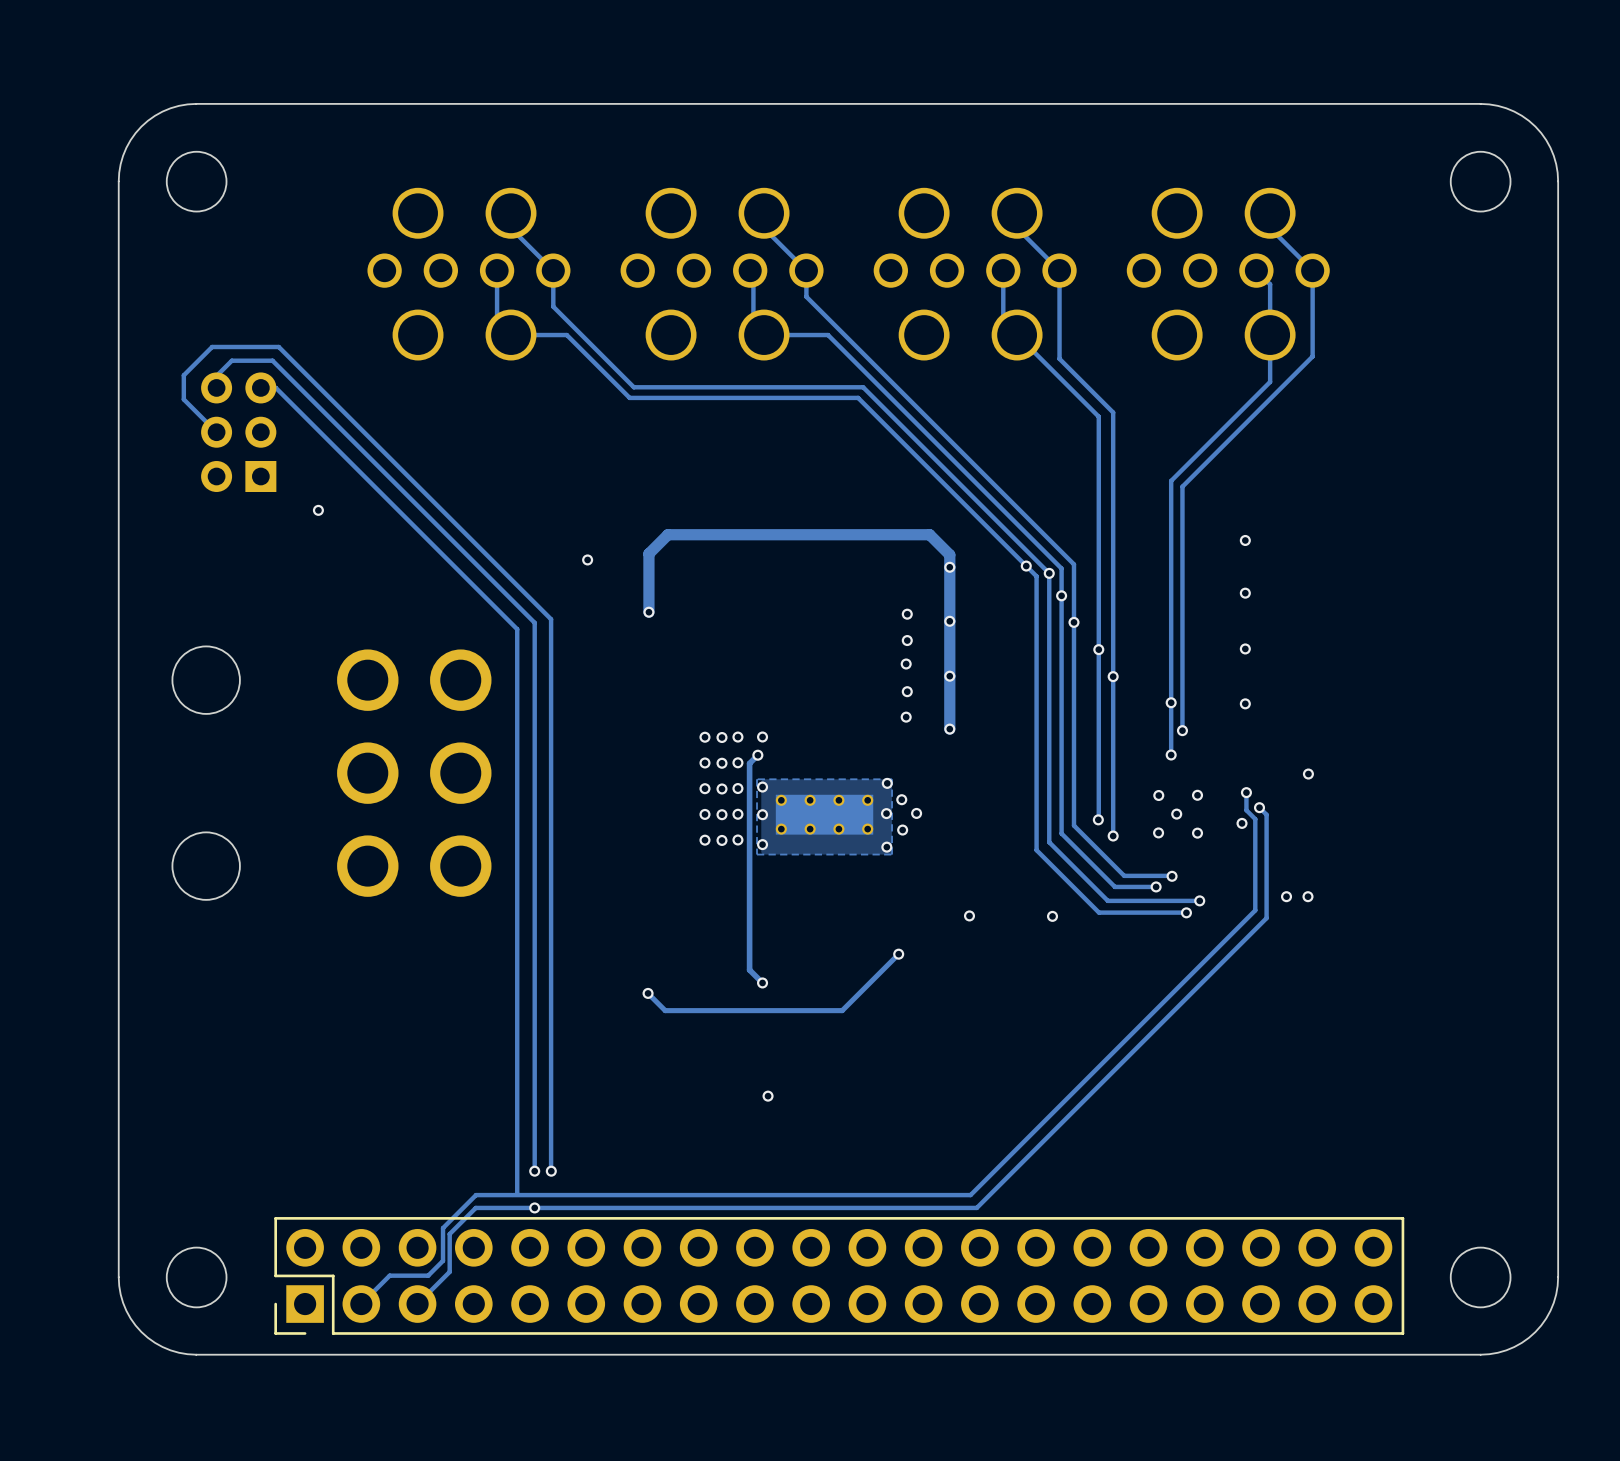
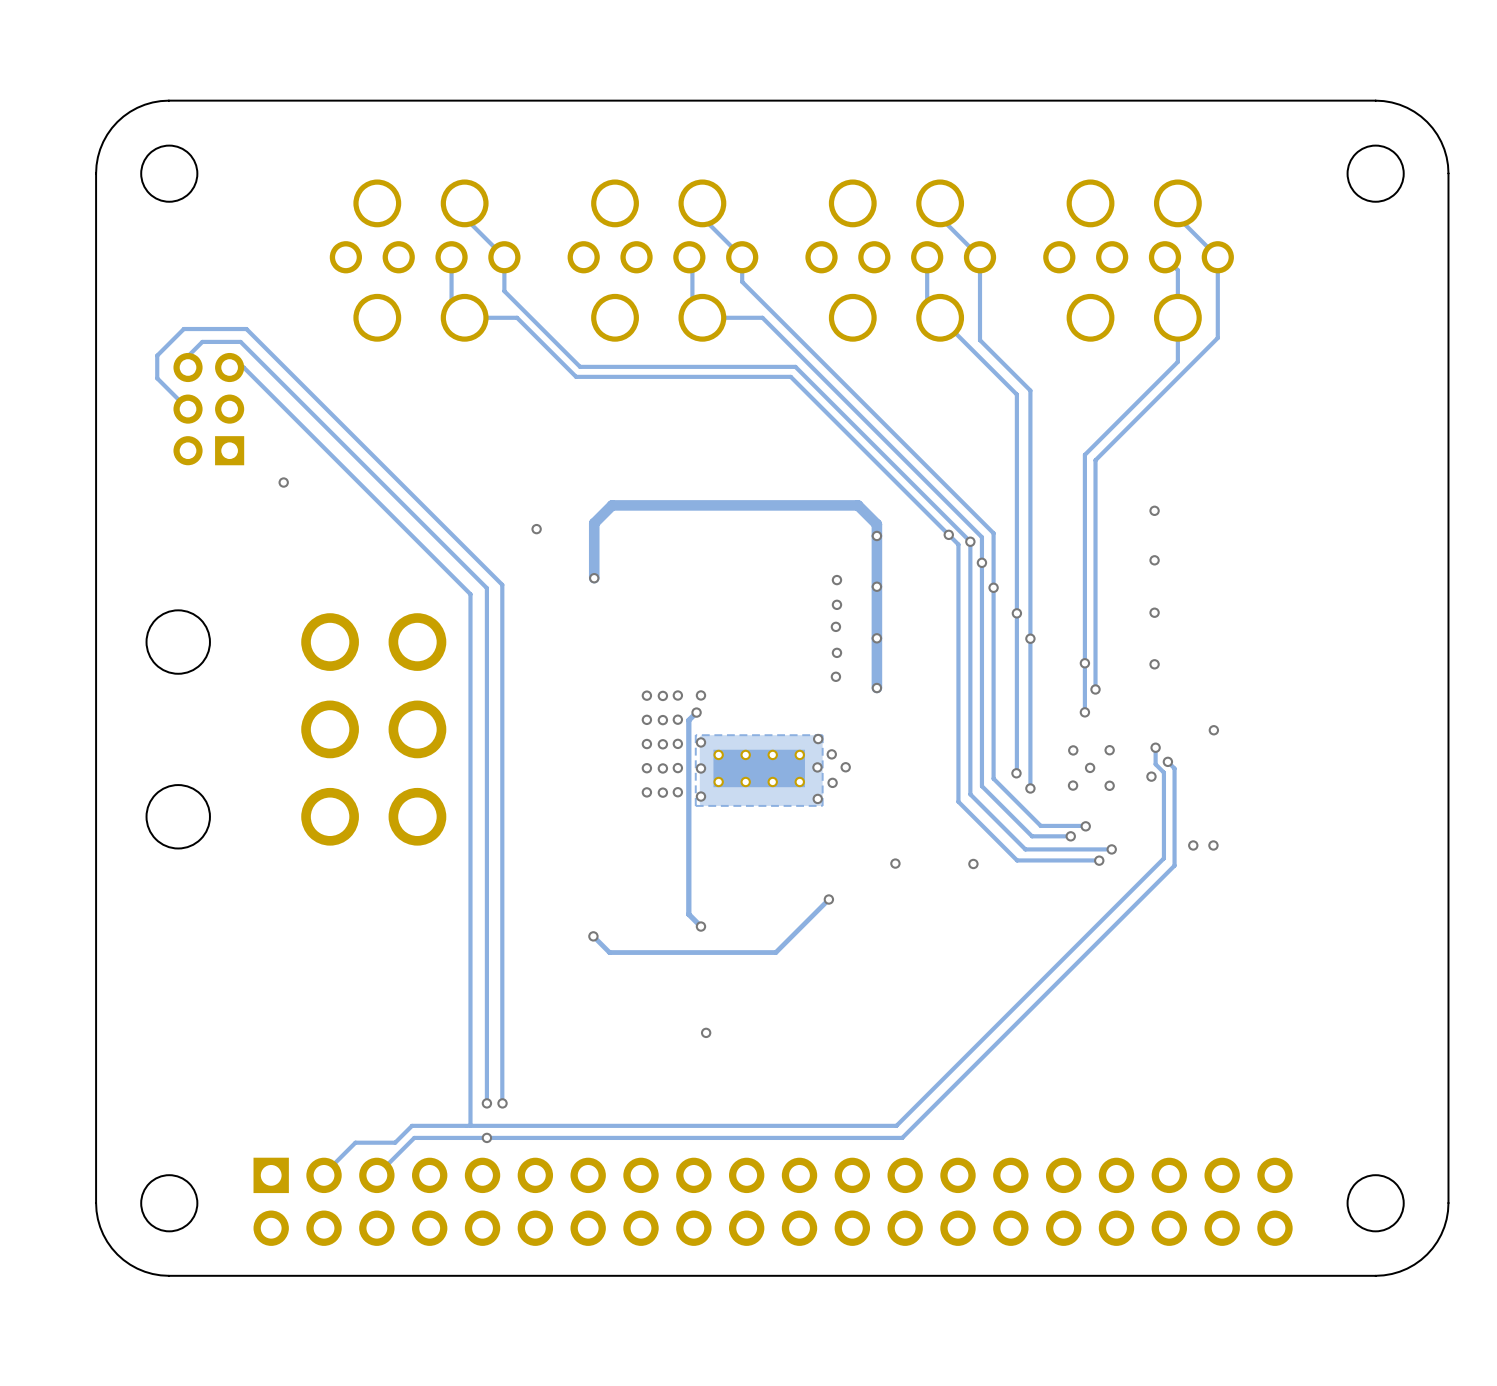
track: (476, 1195) (443, 1228) (443, 1260) (428, 1275) (389, 1275) (361, 1304) -> (431, 1125) (412, 1125) (395, 1142) (355, 1142) (324, 1175)
track: (475, 1207) (449, 1234) (449, 1271) (417, 1304) -> (431, 1137) (414, 1137) (376, 1175)
part side: bottom (839, 1275) -> top (773, 1201)

